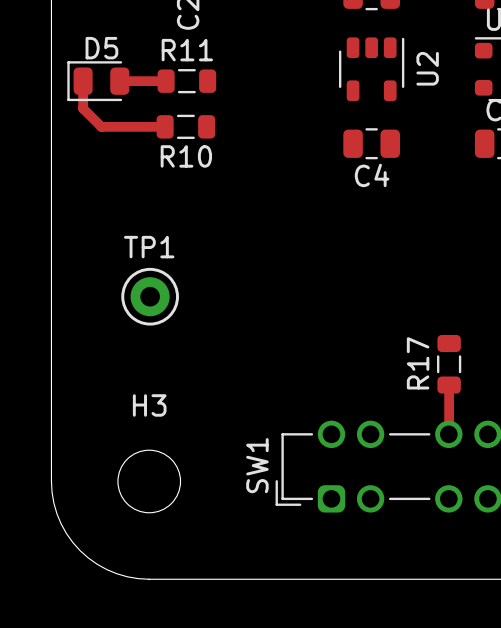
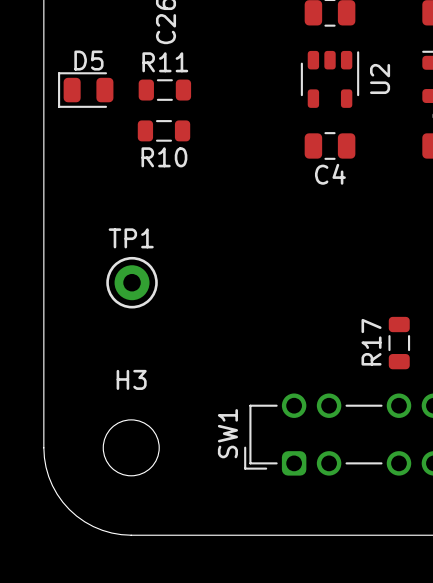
track: (83, 81) (83, 108) (101, 126) (165, 126) -> none
track: (119, 81) (166, 81) -> none
track: (449, 385) (448, 434) -> none

